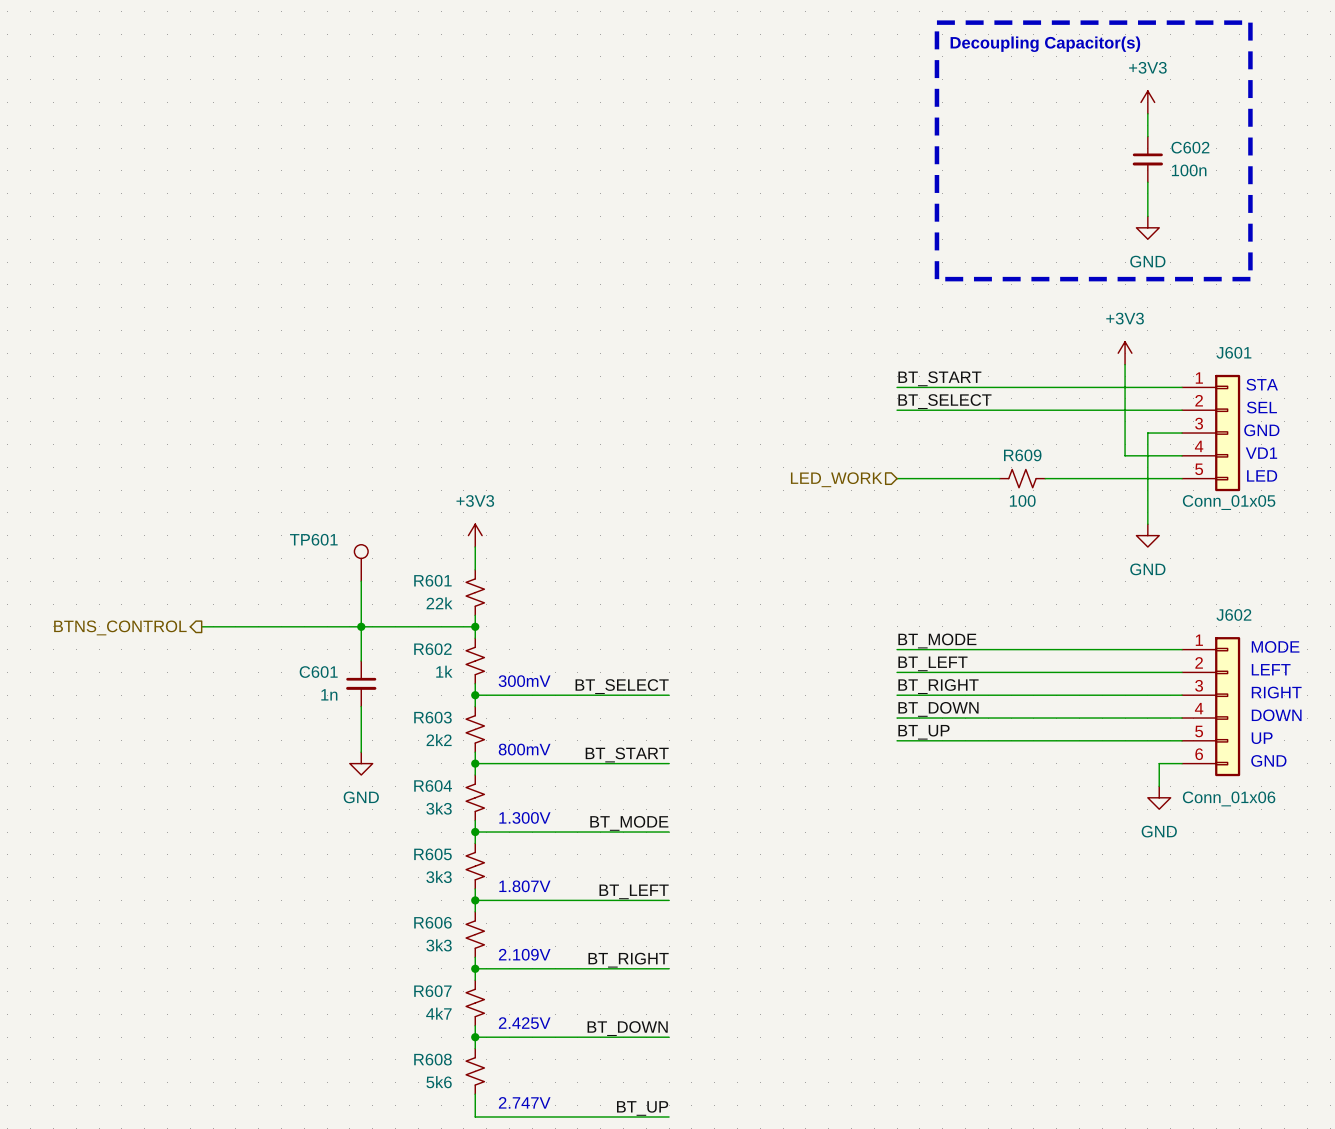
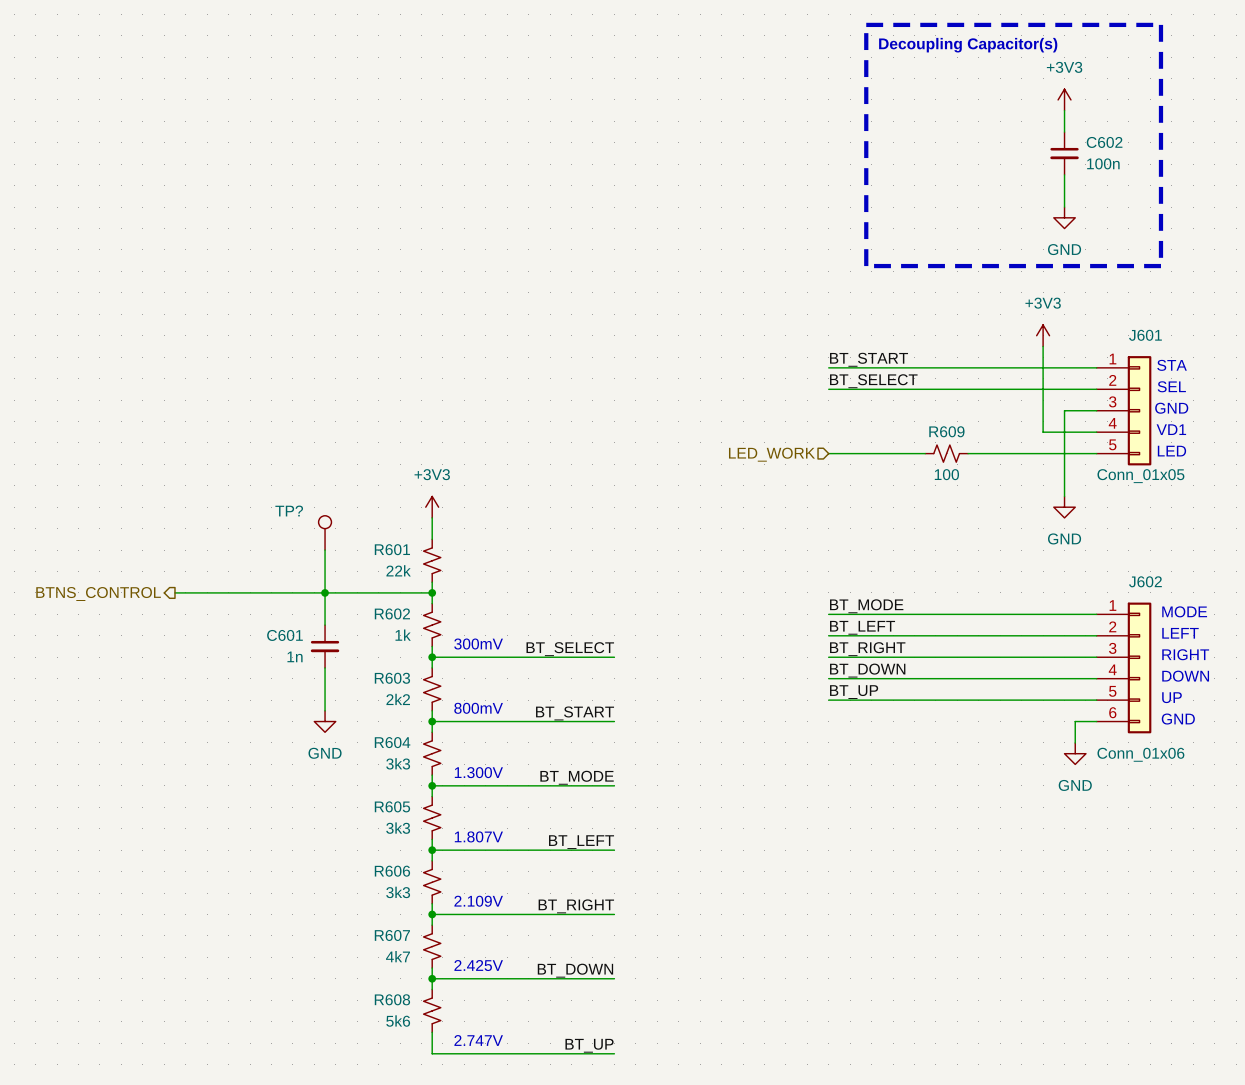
TP601 name: TP601 (313, 539) -> TP? (289, 511)

